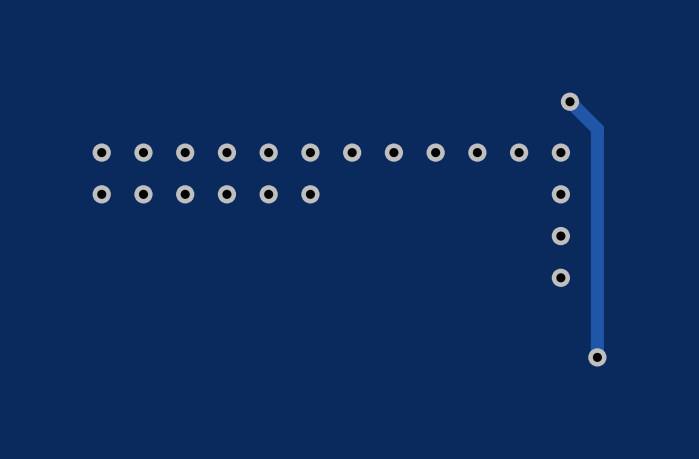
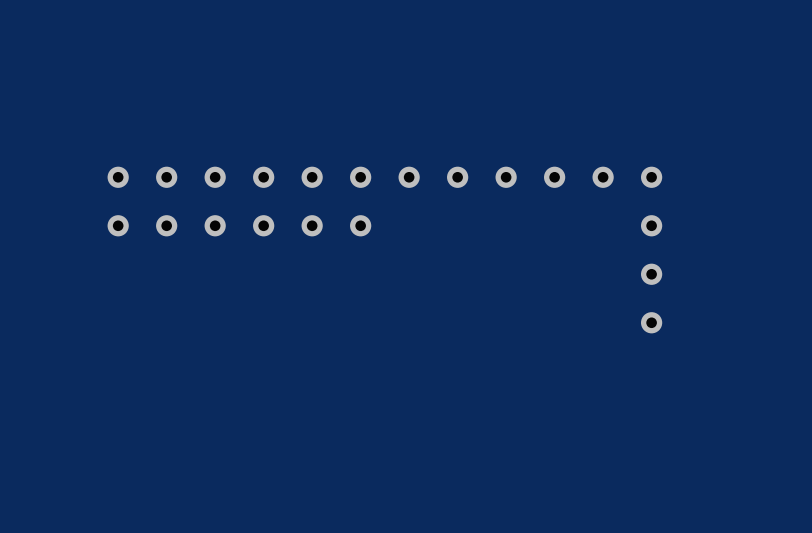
track: (570, 101) (597, 129) (597, 357) -> none
via: (570, 101) -> none
via: (597, 357) -> none

